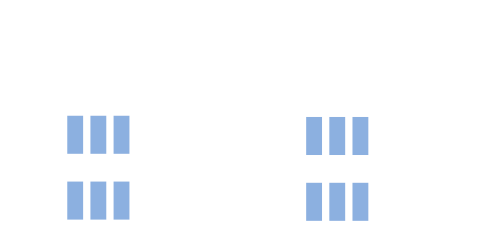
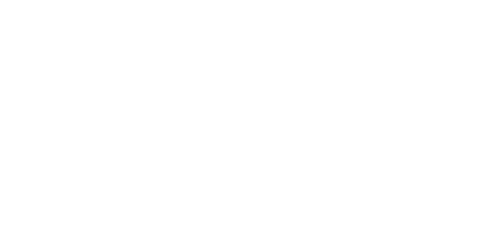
part: (98, 167) -> none
part: (337, 168) -> none

